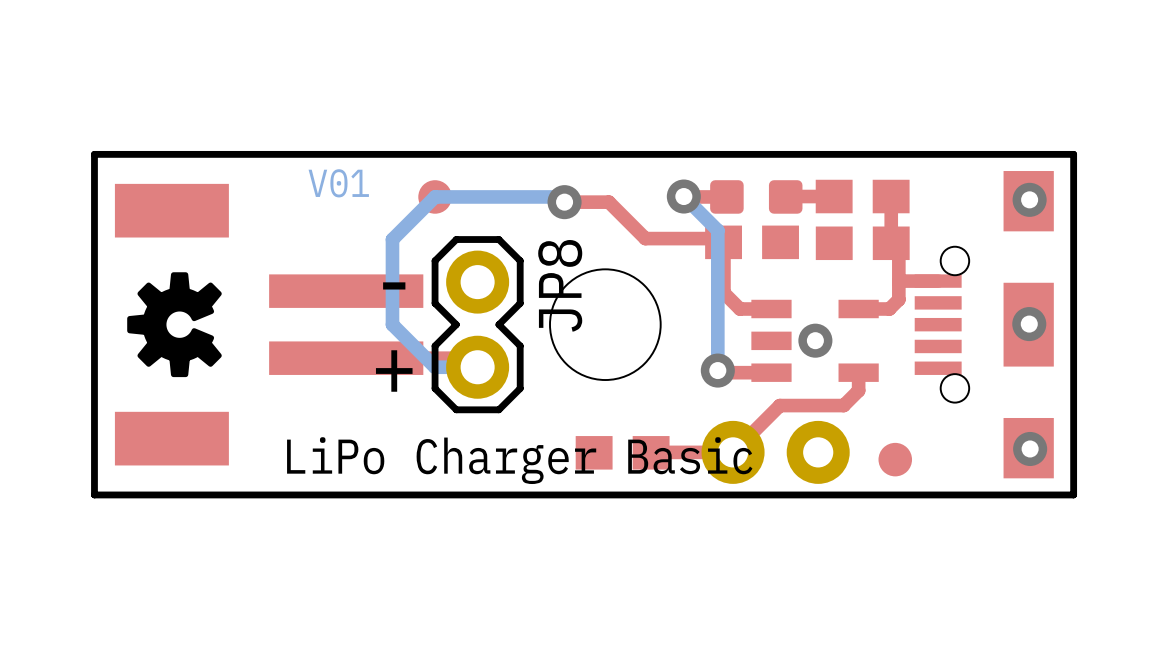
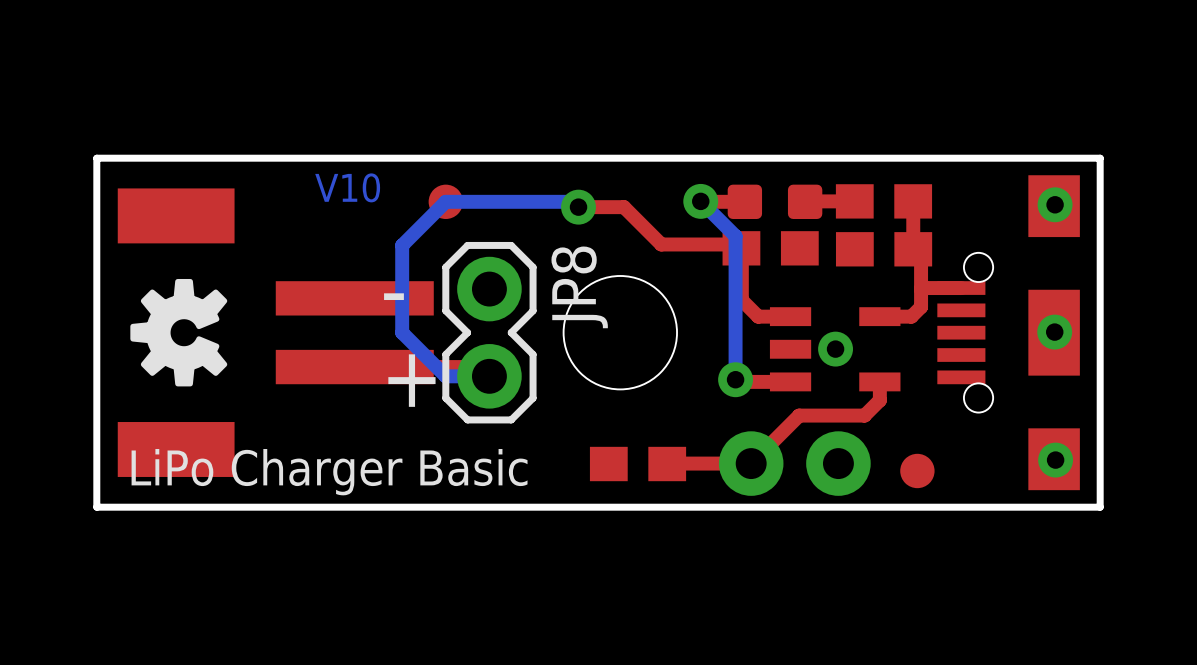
text: V01 (338, 183) -> V10 (347, 187)
text position: LiPo Charger Basic (519, 460) -> LiPo Charger Basic (329, 472)

